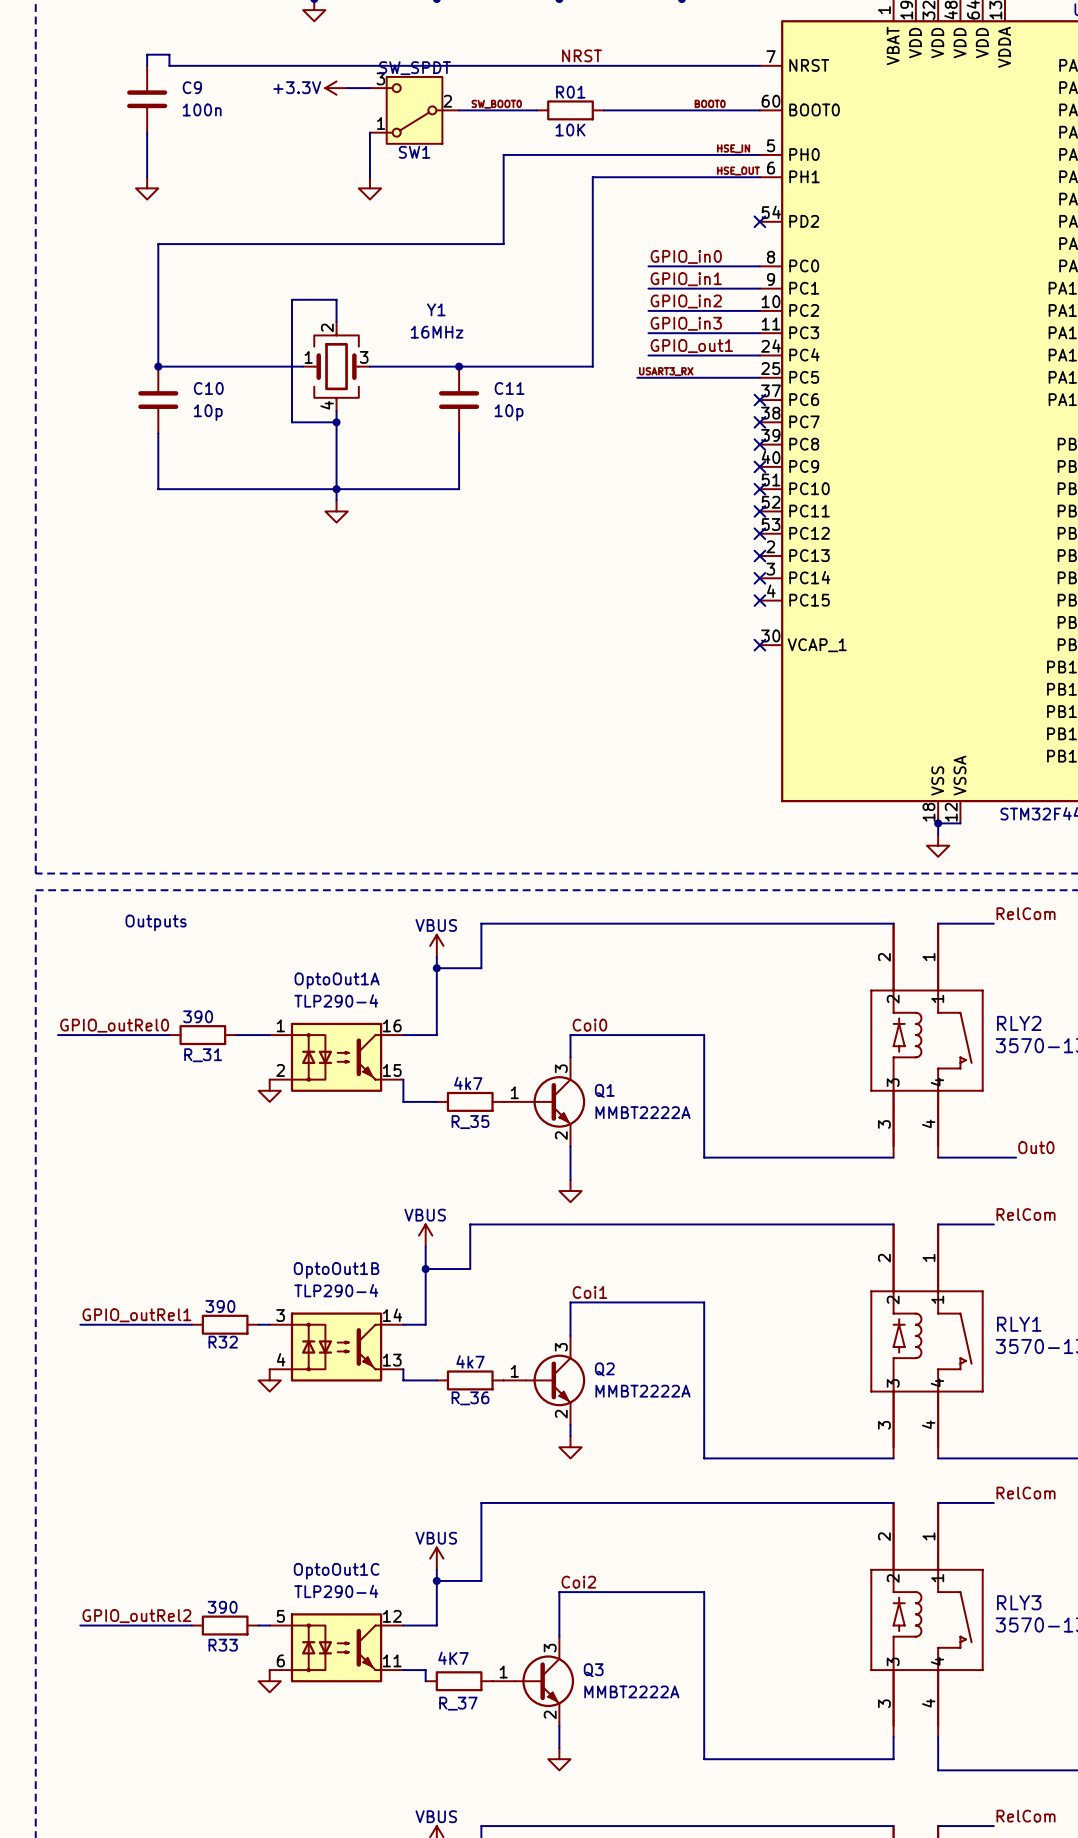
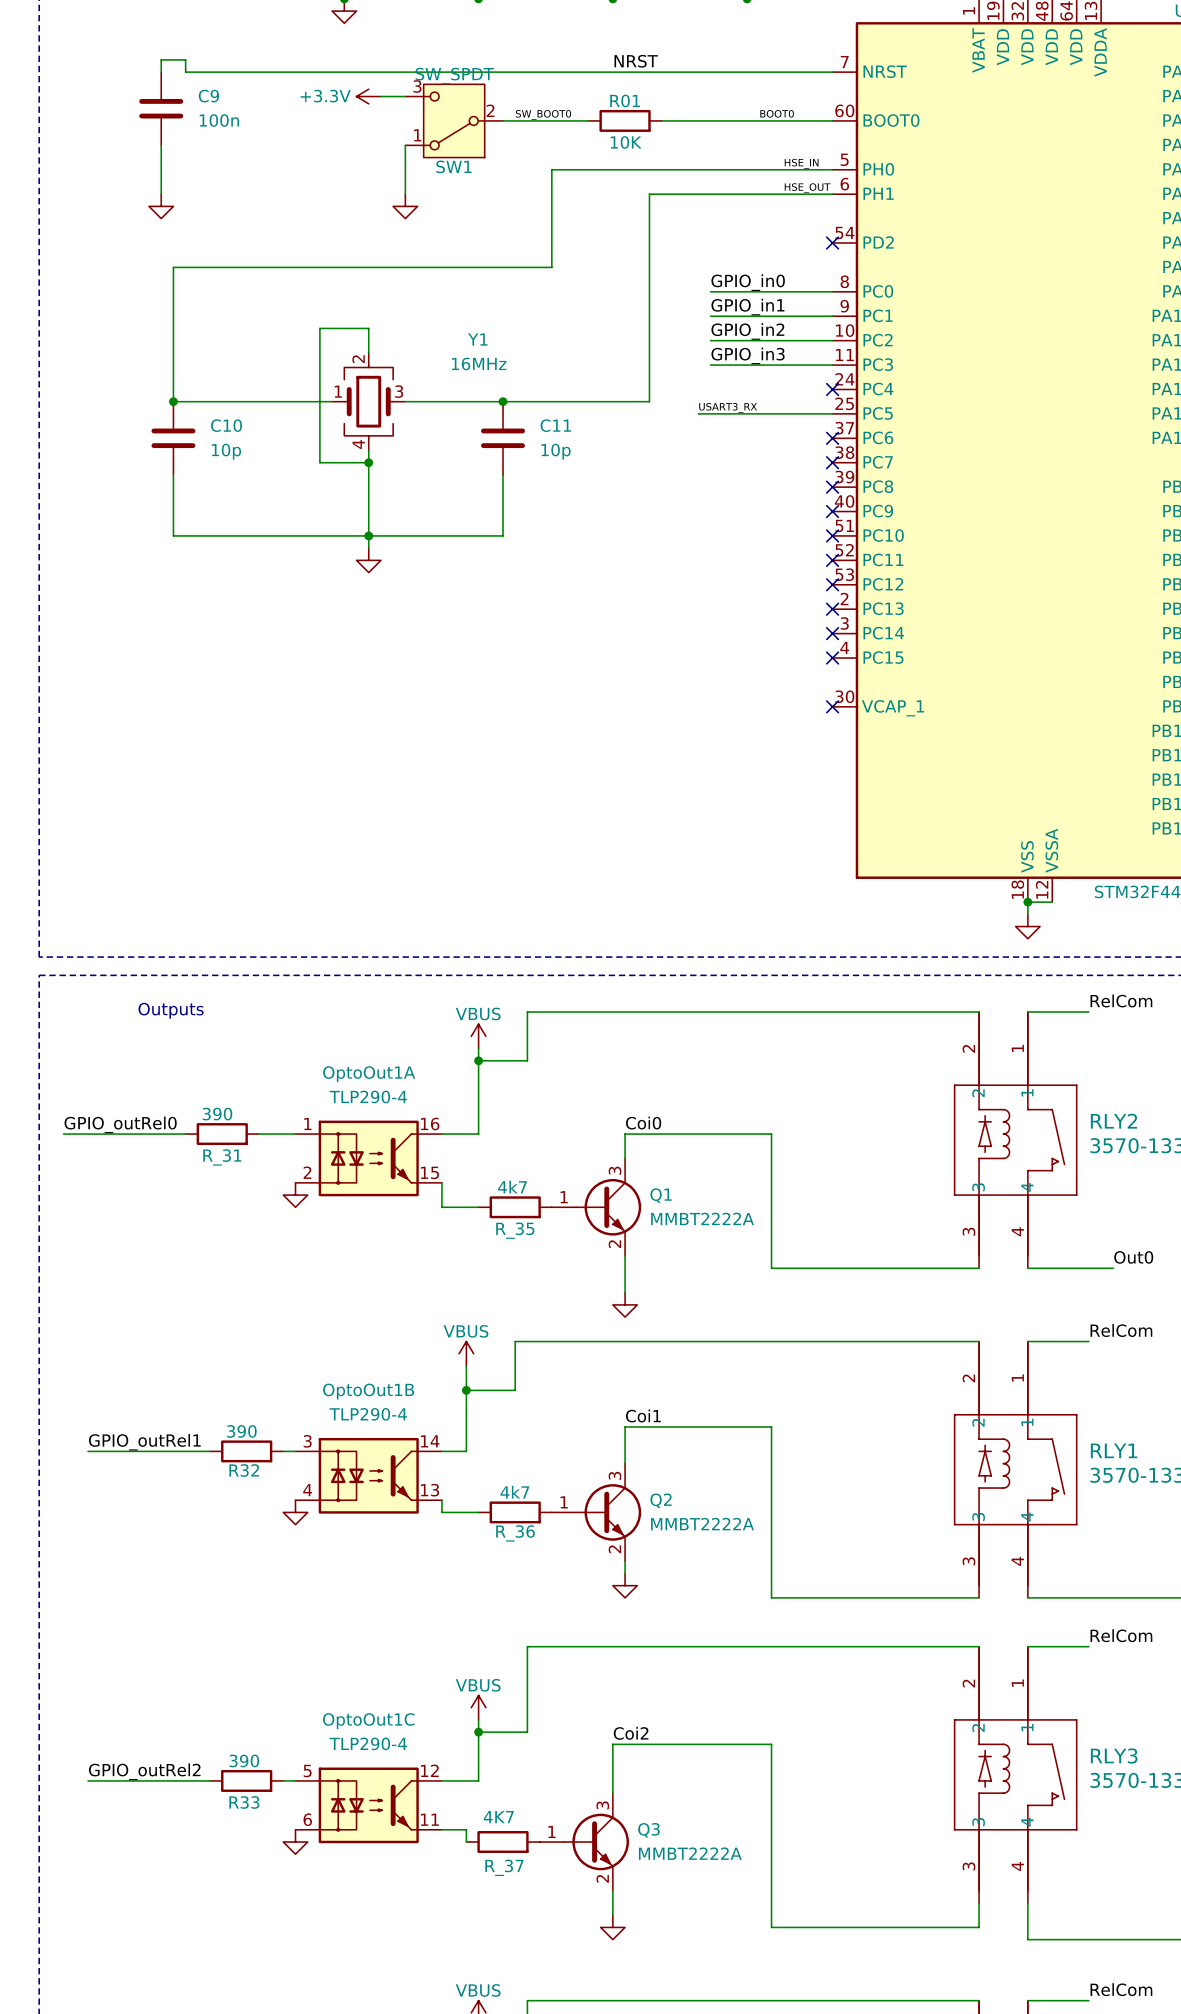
label: GPIO_out1 (691, 346) -> none
wire: (648, 355) (759, 355) -> none
no-connect mark: none -> (832, 389)

